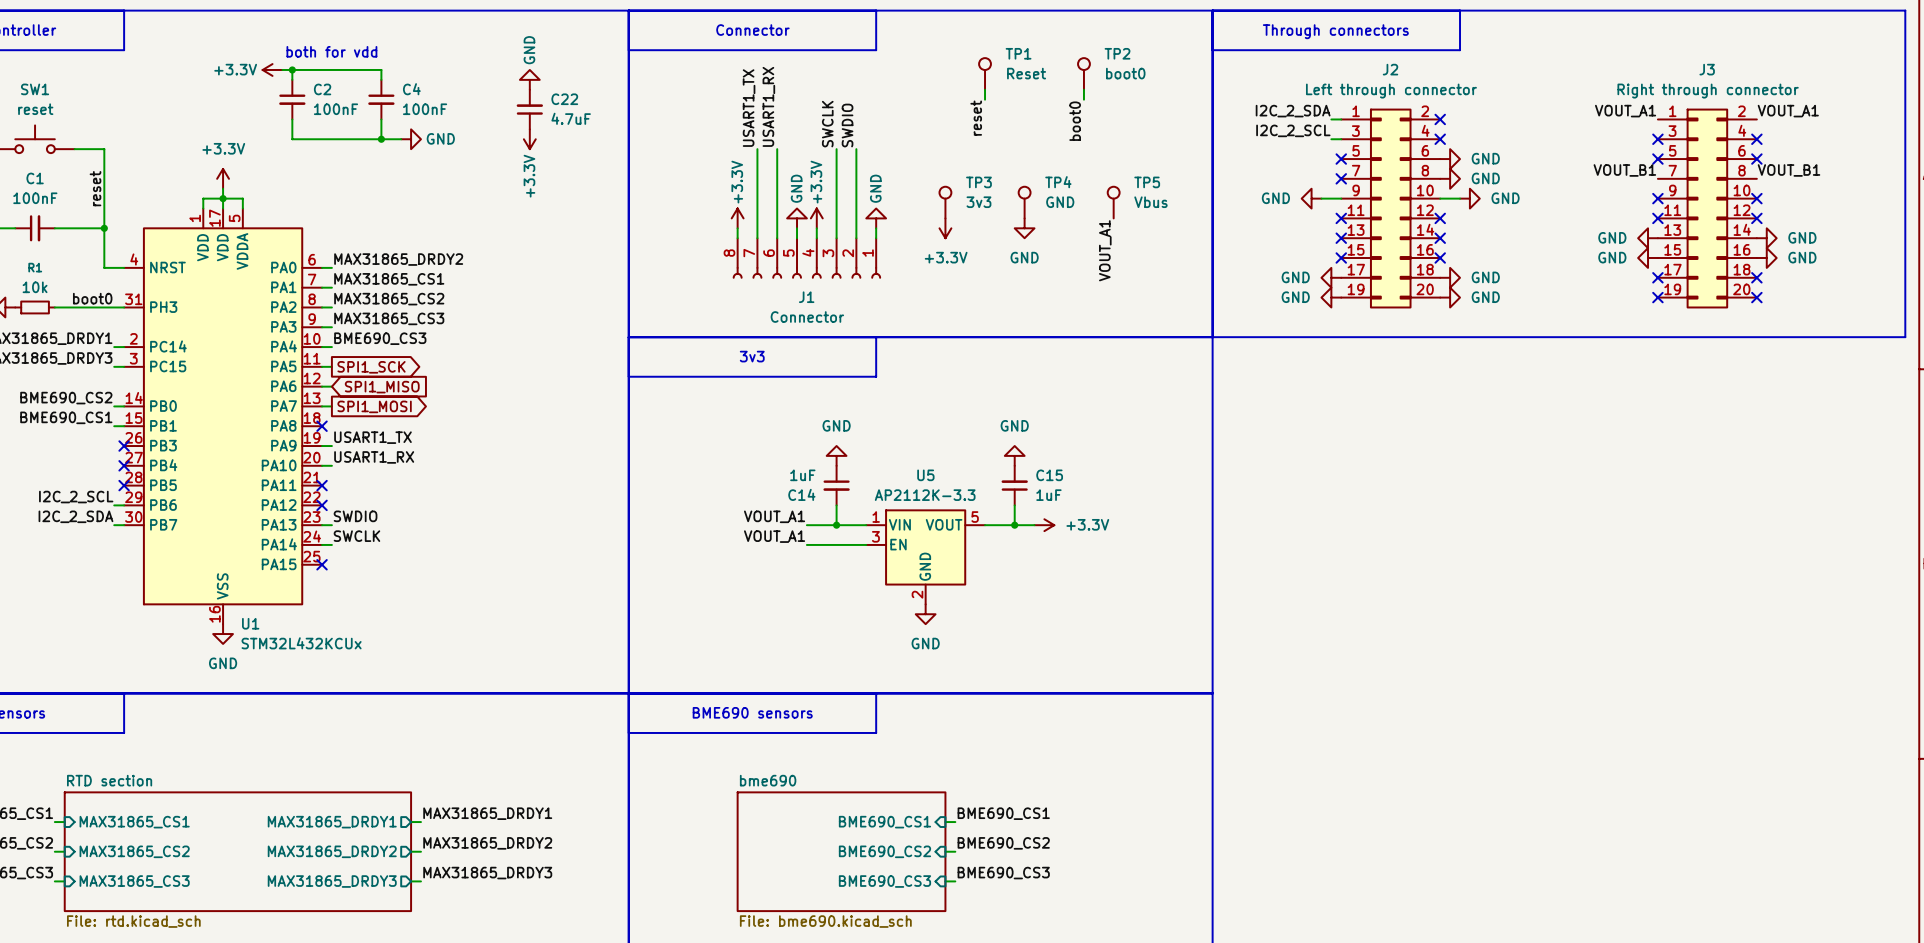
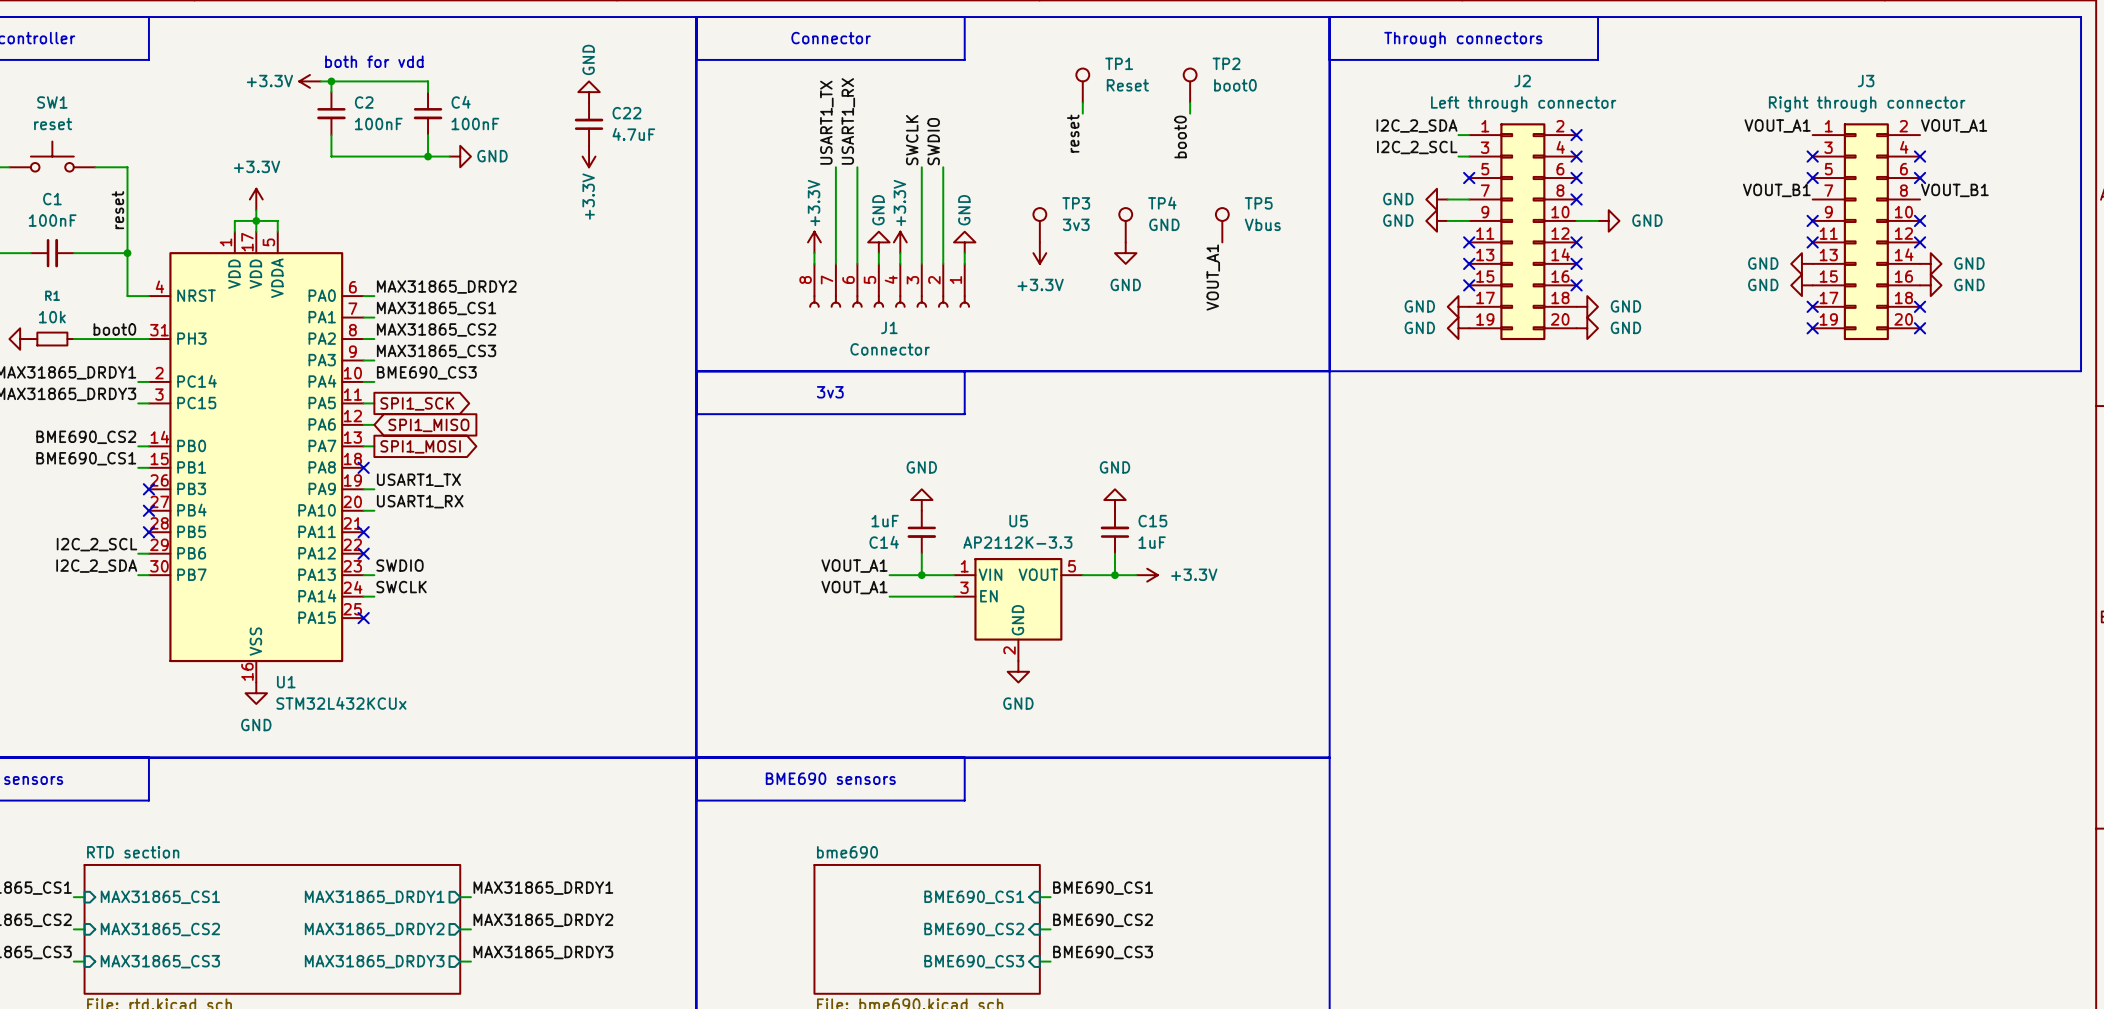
no-connect mark: none -> (1576, 178)
power symbol: GND (1450, 159) -> none
power symbol: none -> GND (1437, 199)
wire: none -> (1447, 199) (1469, 199)
no-connect mark: (1341, 178) -> none
no-connect mark: none -> (1576, 199)
power symbol: GND (1450, 178) -> none

